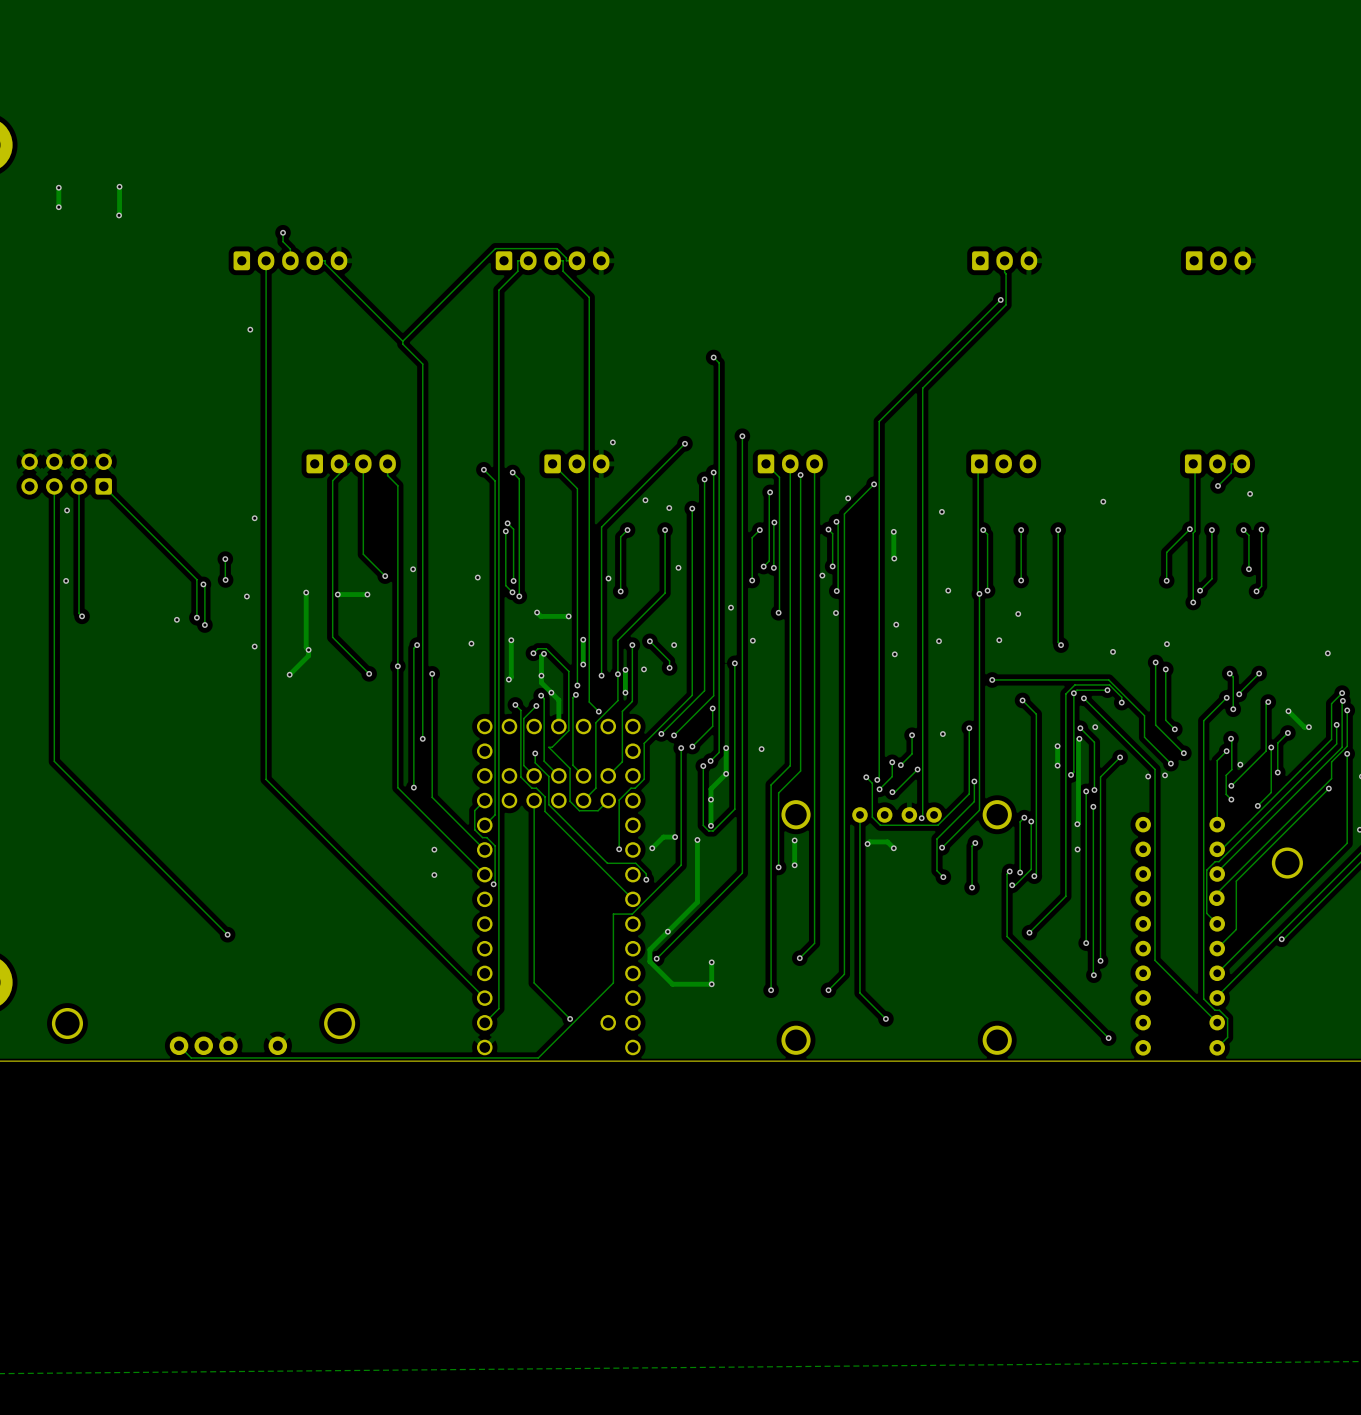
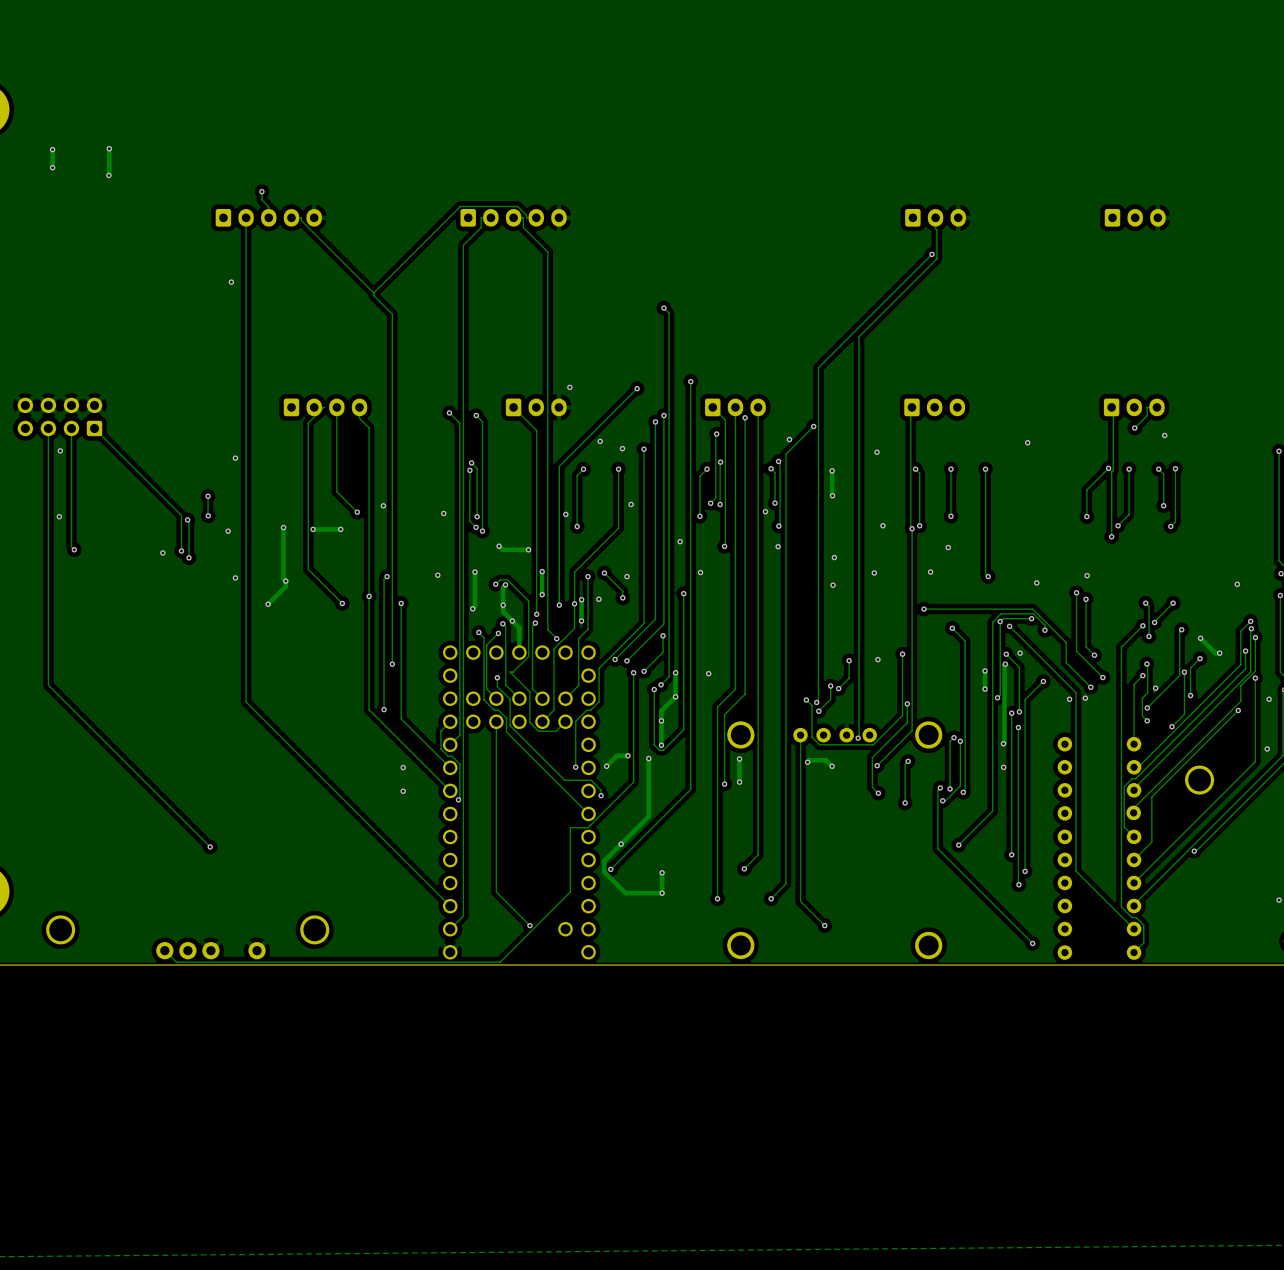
track: (917, 769) (894, 792) (892, 792) -> none
via: (917, 769) -> none
via: (892, 792) -> none

